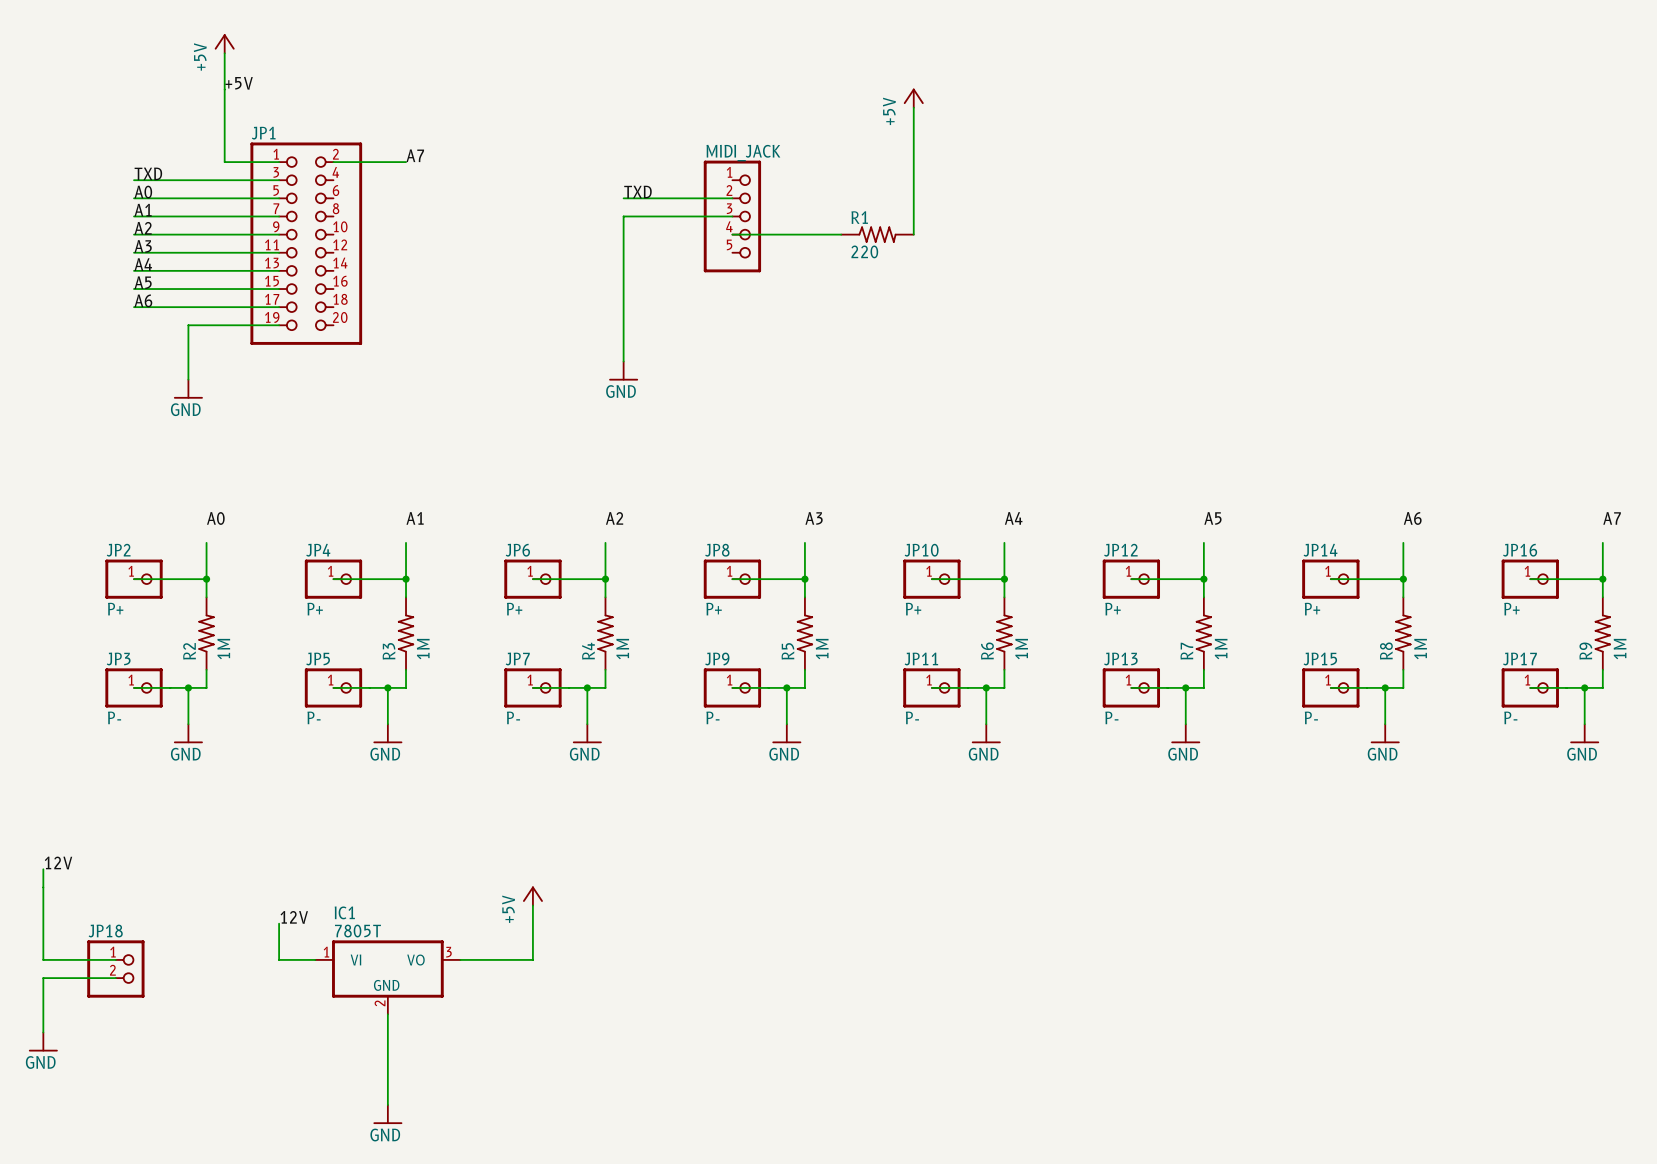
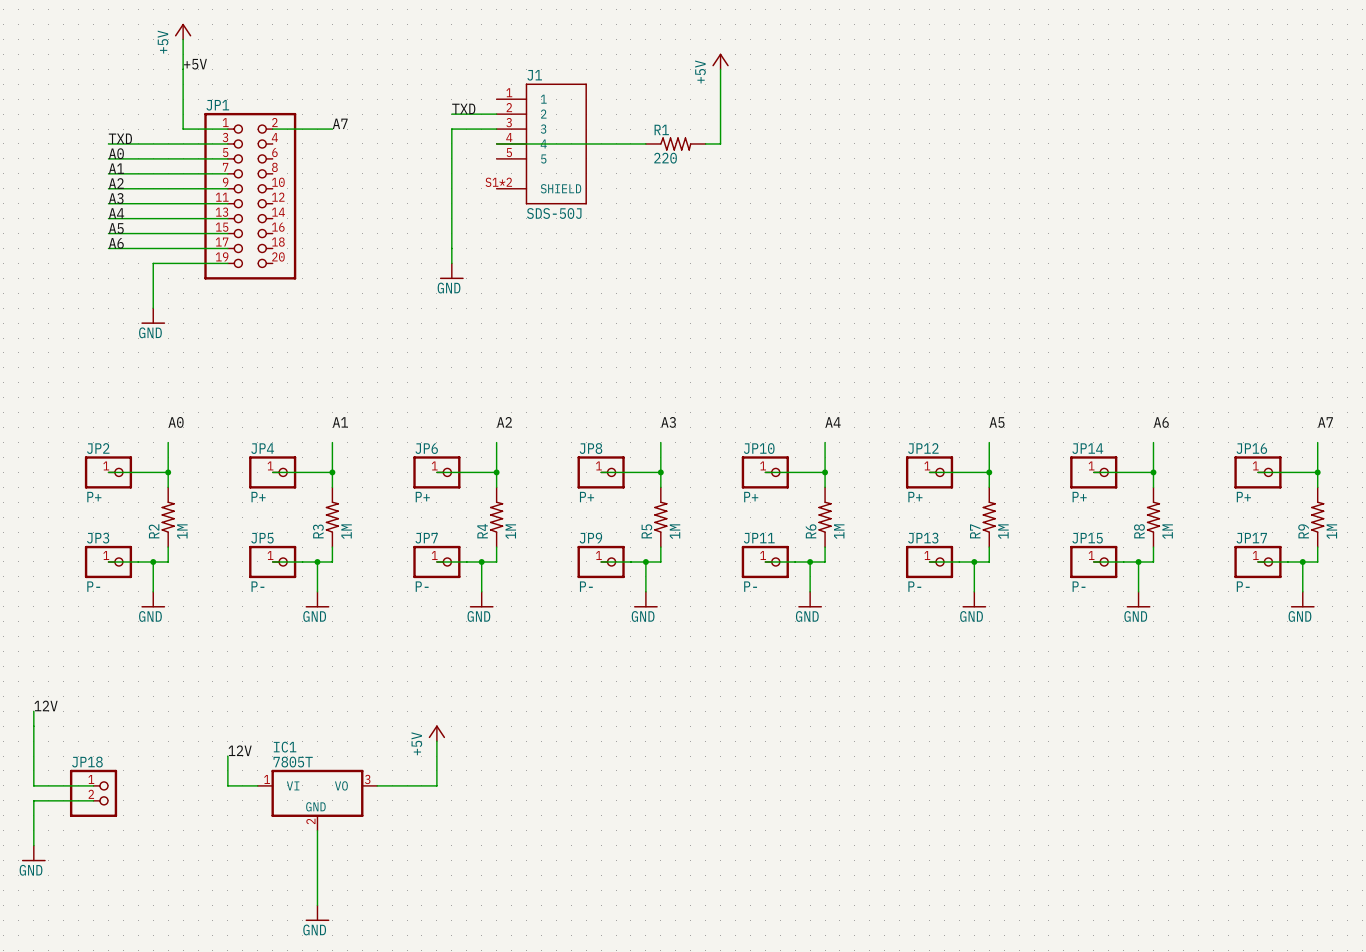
wire: none -> (720, 69) (720, 143) (705, 143)
power symbol position: +5V (913, 98) -> +5V (720, 61)
wire: (913, 107) (913, 234) -> none
wire: none -> (451, 114) (496, 114)
wire: none -> (496, 129) (451, 129) (451, 263)
wire: none -> (496, 143) (645, 143)
J1: none -> SDS-50J (541, 143)
label position: TXD (637, 192) -> TXD (463, 108)
wire: (623, 198) (732, 198) -> none
wire: (732, 216) (623, 216) (623, 361) -> none
MIDI_JACK: (732, 216) -> none
wire: (732, 234) (841, 234) -> none
R1 position: (877, 234) -> (675, 143)
power symbol position: GND (623, 371) -> GND (451, 271)

